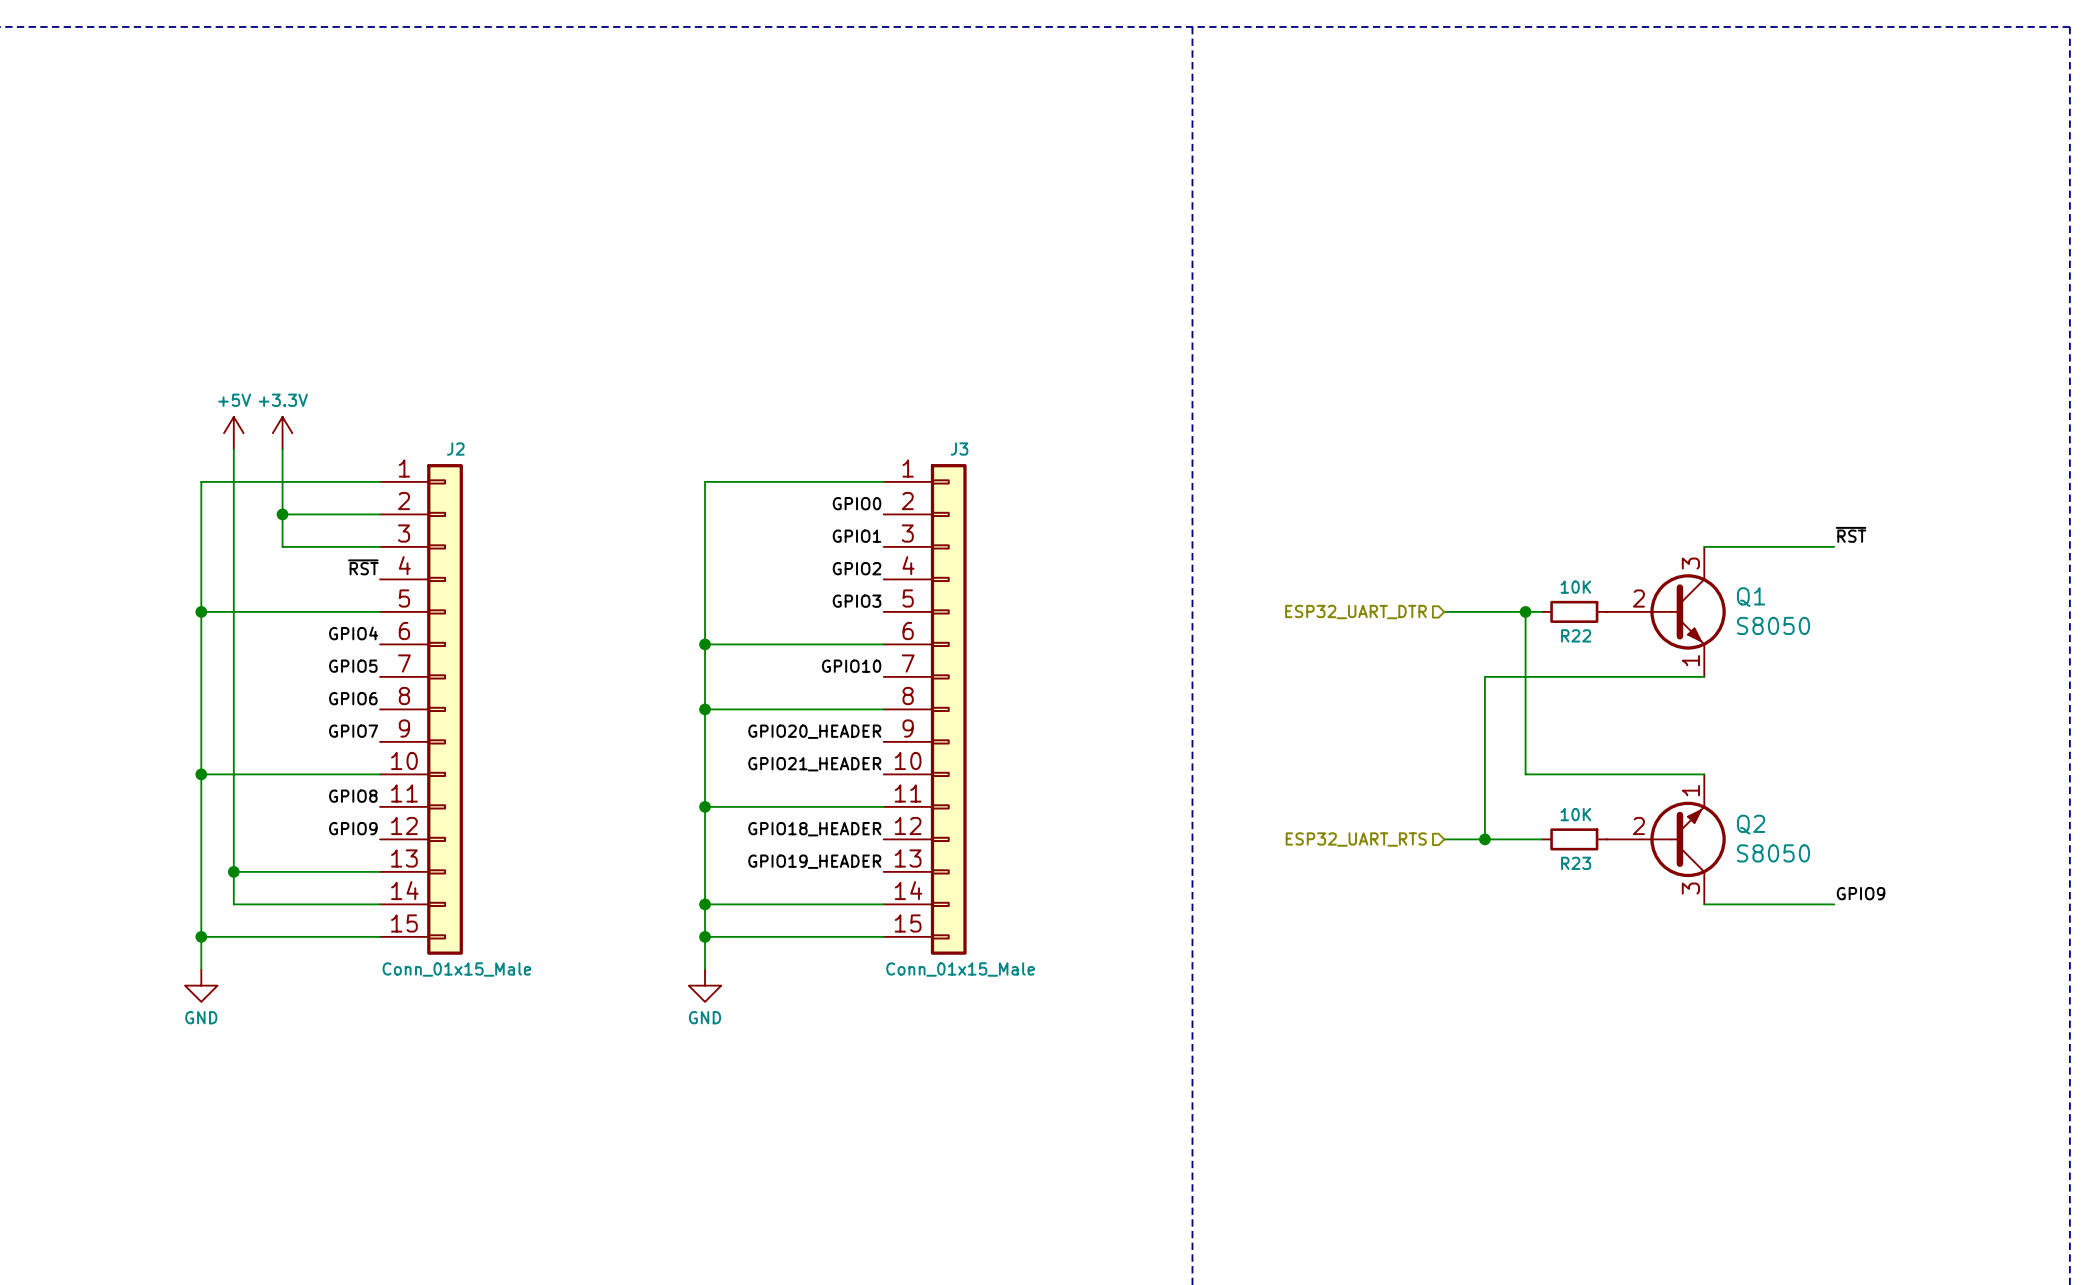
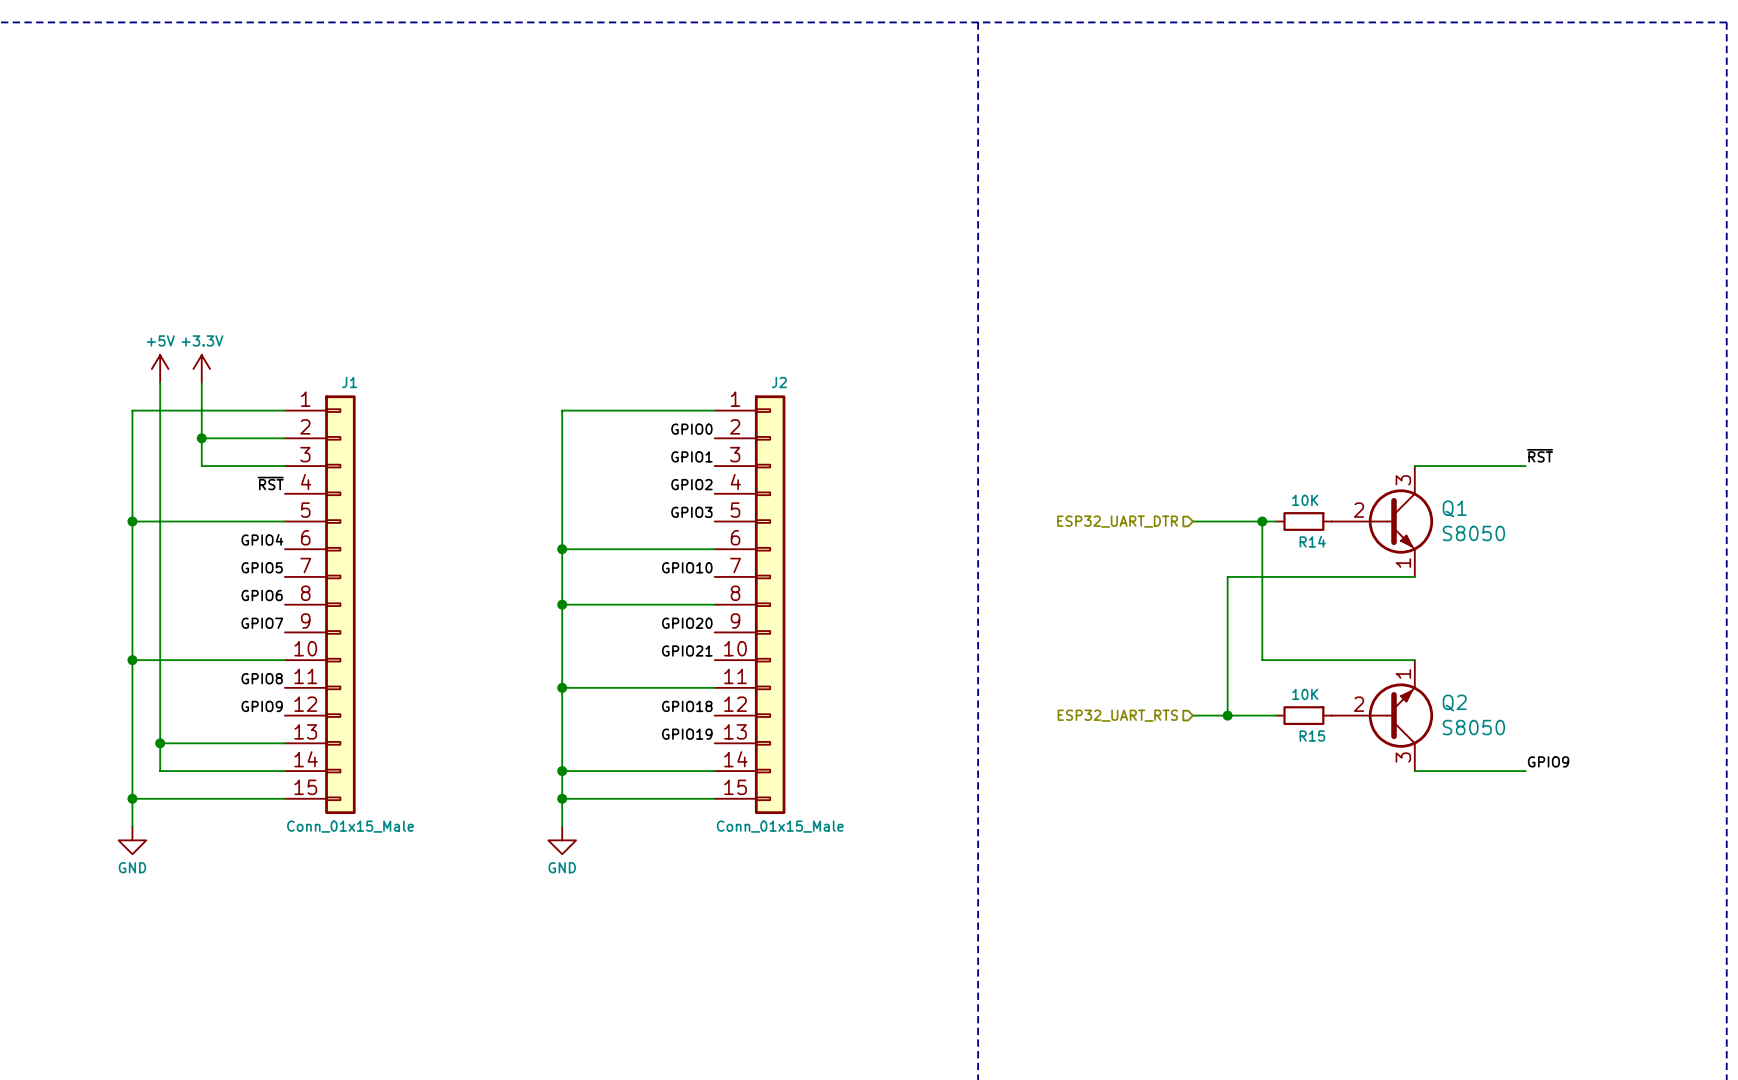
J2 name: J2 (455, 449) -> J1 (349, 382)
J3 name: J3 (959, 449) -> J2 (779, 382)
R22 name: R22 (1576, 635) -> R14 (1312, 541)
label: GPIO20_HEADER (814, 731) -> GPIO20 (687, 623)
label: GPIO21_HEADER (814, 764) -> GPIO21 (687, 650)
label: GPIO18_HEADER (814, 829) -> GPIO18 (687, 706)
label: GPIO19_HEADER (814, 861) -> GPIO19 (687, 734)
R23 name: R23 (1576, 863) -> R15 (1312, 736)

